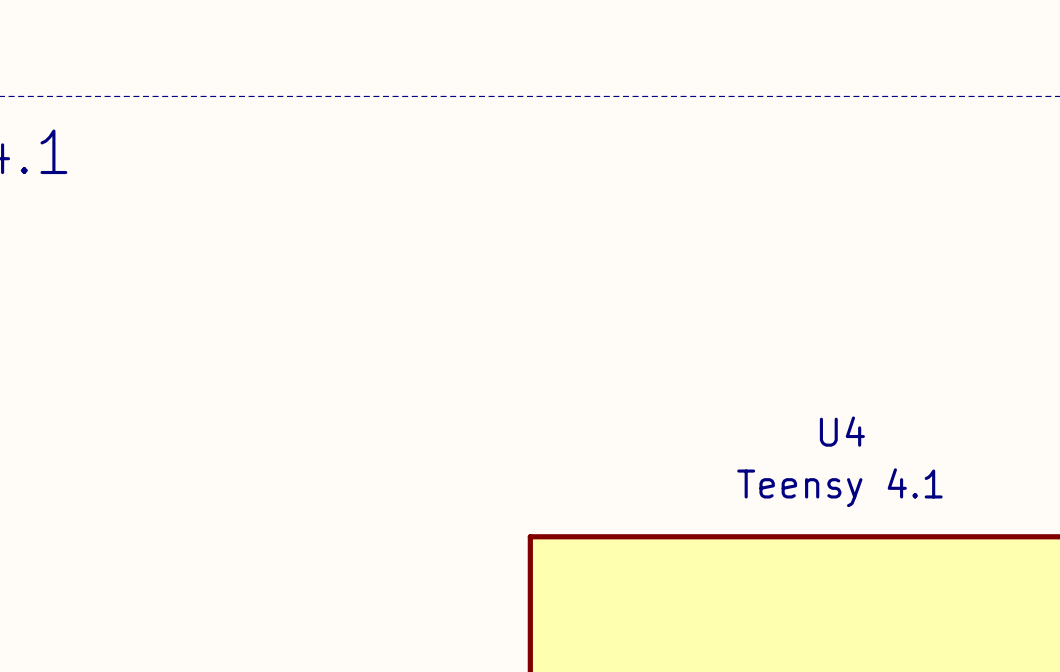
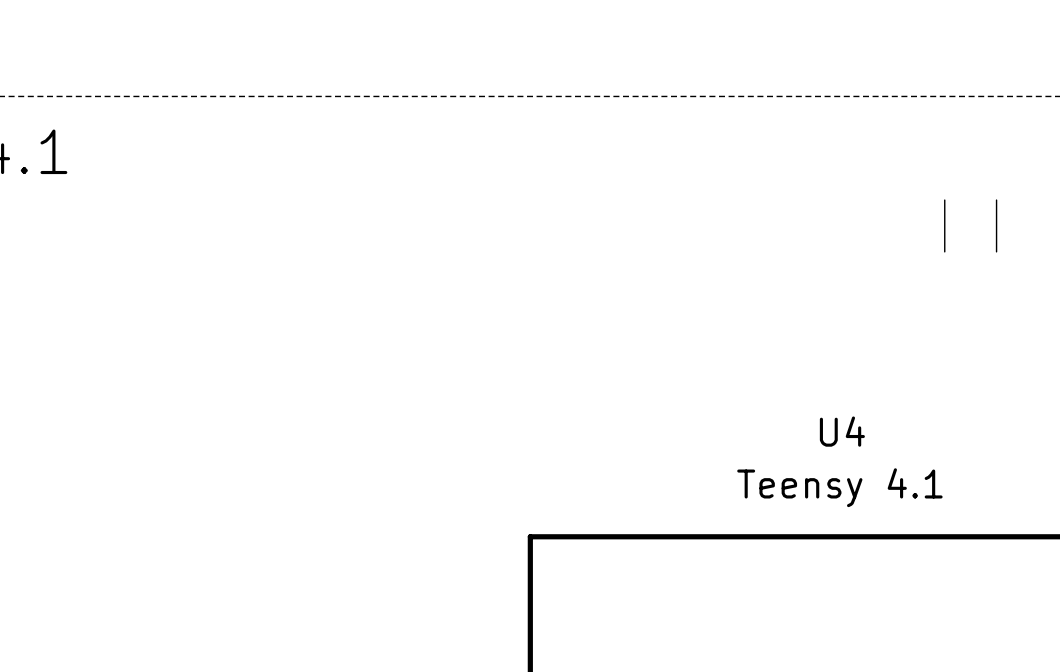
wire: none -> (944, 200) (944, 251)
wire: none -> (996, 200) (996, 251)

